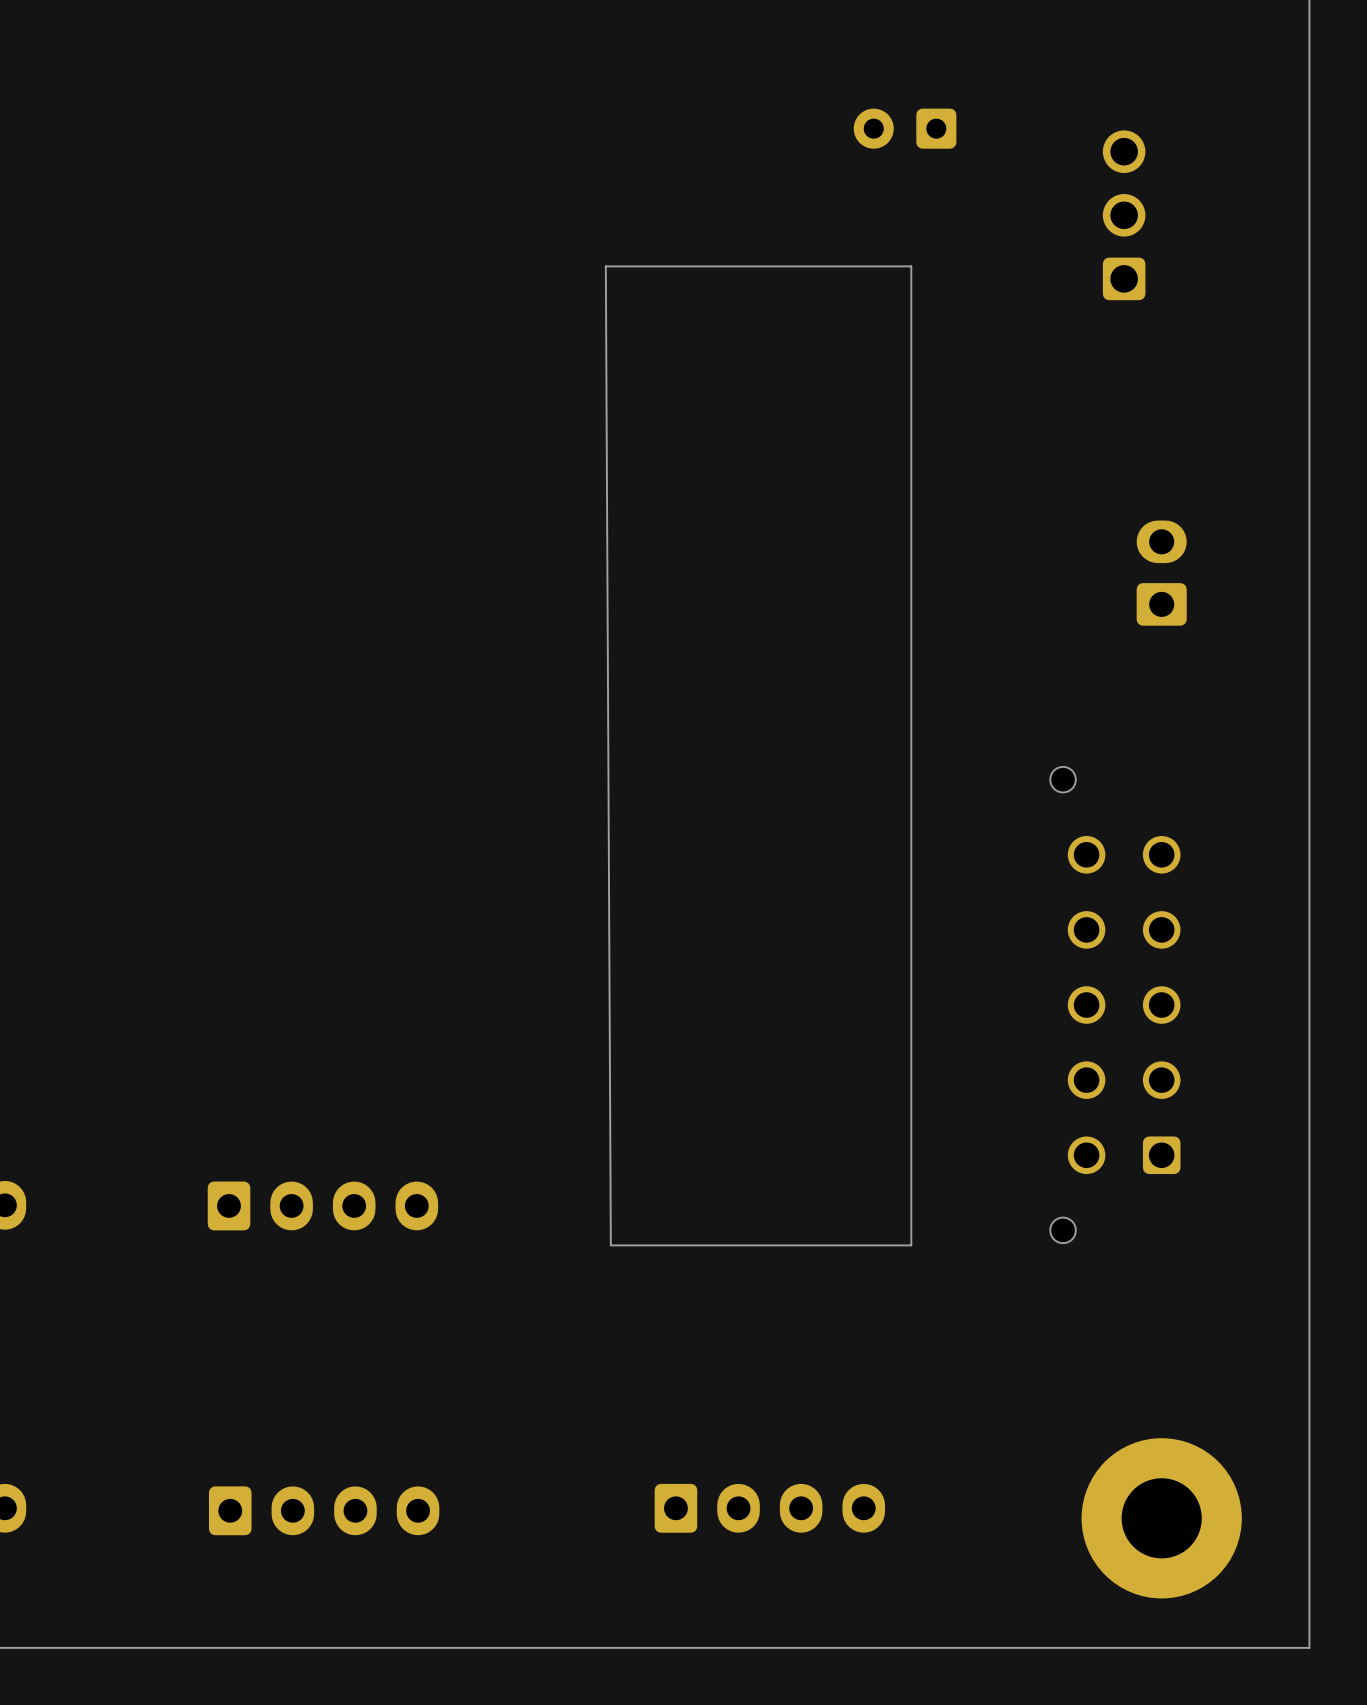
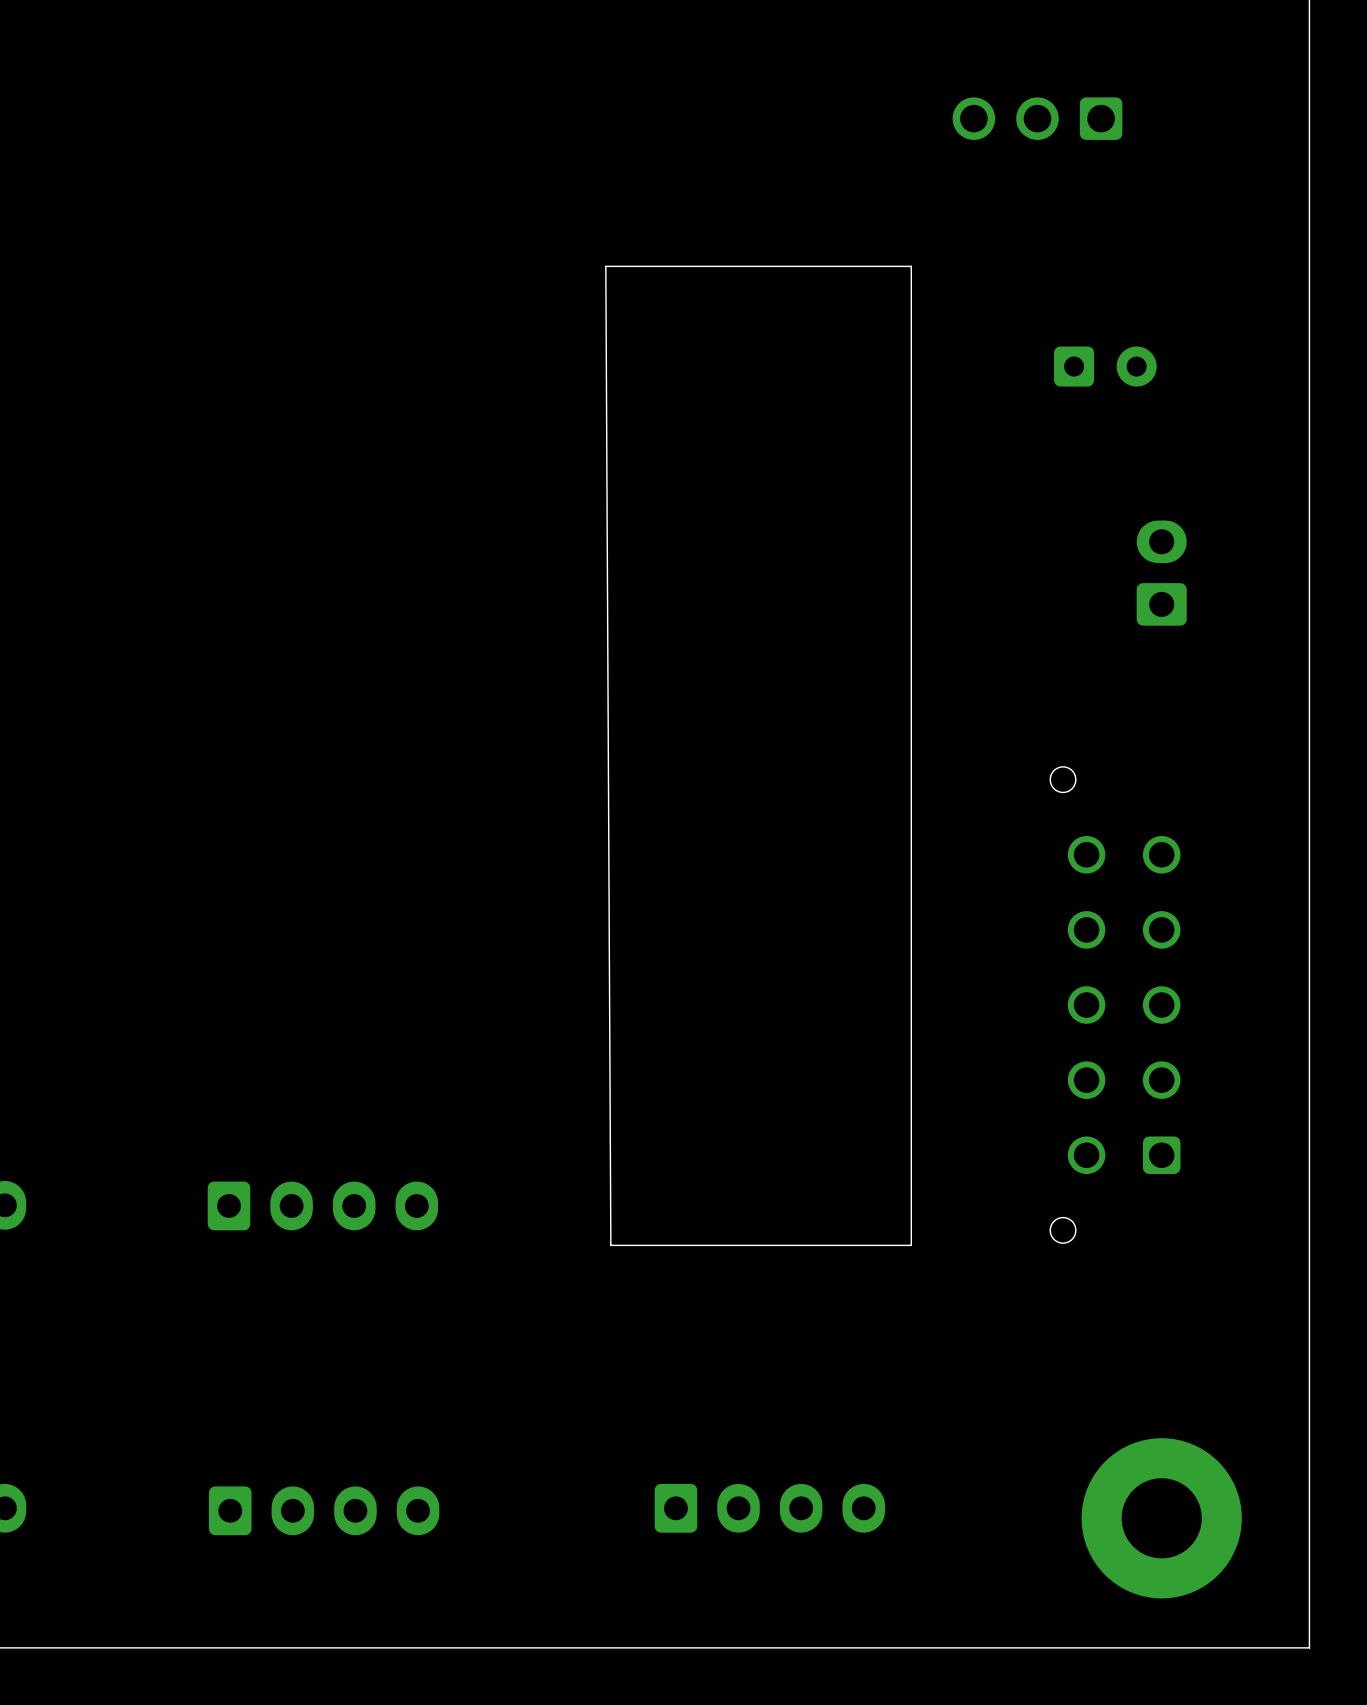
part rotation: 0° (905, 128) -> 180° (1105, 366)
part position: (905, 128) -> (1105, 366)
part rotation: 0° (1124, 215) -> 90° counterclockwise (1037, 118)
part position: (1124, 215) -> (1037, 118)

